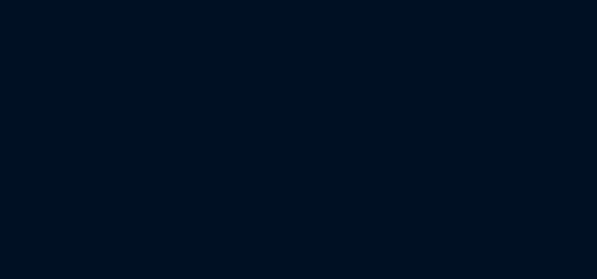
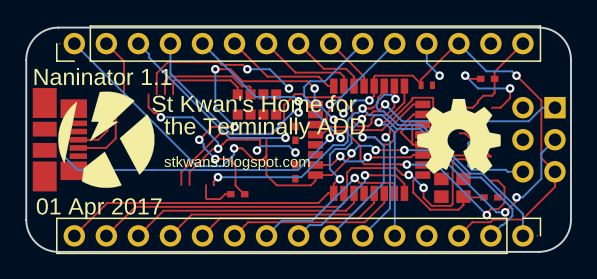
board edge: none -> (538, 27) (58, 27) (46, 30) (32, 40) (26, 55) (26, 219) (28, 232) (38, 245) (50, 250) (58, 251) (538, 251) (551, 249) (564, 239) (570, 224) (570, 59) (568, 47) (561, 36) (551, 30) (538, 27)
bottom track: none -> (74, 43) (196, 166) (222, 166) (234, 154) (234, 148)
top track: none -> (106, 43) (123, 61) (123, 94)
bottom track: none -> (138, 43) (149, 54) (149, 57) (229, 137) (285, 137)
bottom track: none -> (170, 43) (170, 73) (231, 134) (270, 134) (292, 112) (298, 112)
bottom track: none -> (202, 43) (255, 96) (294, 96) (298, 101)
top track: none -> (234, 43) (267, 76) (318, 76) (328, 86) (333, 86)
top track: none -> (266, 43) (295, 72) (339, 72) (343, 76) (343, 86)
top track: none -> (298, 43) (323, 68) (346, 68) (353, 76) (353, 86)
part: none -> (298, 43)
top track: none -> (330, 43) (364, 76) (364, 86)
bottom track: none -> (362, 43) (325, 81) (310, 81) (304, 87) (304, 96) (312, 104) (312, 110) (340, 137)
bottom track: none -> (394, 43) (333, 104) (329, 104)
bottom track: none -> (426, 43) (426, 62) (439, 75)
top track: none -> (458, 43) (421, 79) (421, 85)
bottom track: none -> (458, 43) (486, 71) (512, 71) (516, 75)
top track: none -> (522, 43) (494, 71) (494, 93) (491, 95) (483, 95) (472, 107) (464, 107)
top track: none -> (215, 69) (230, 69) (242, 81) (307, 81) (314, 88)
bottom track: none -> (215, 69) (215, 107) (234, 126)
via: none -> (215, 69)
top track: none -> (247, 69) (243, 64) (221, 64) (218, 62) (168, 62) (156, 73) (156, 94)
bottom track: none -> (247, 69) (269, 69) (289, 88)
via: none -> (247, 69)
via: none -> (439, 75)
top track: none -> (465, 75) (468, 78) (480, 78)
bottom track: none -> (465, 75) (478, 88) (510, 88)
via: none -> (465, 75)
top track: none -> (516, 75) (541, 100) (541, 158) (554, 171) (554, 186) (522, 219) (493, 219) (490, 222) (472, 222) (458, 235)
via: none -> (516, 75)
text: none -> Naninator 1.1 (102, 76)
part: none -> (487, 78)
top track: none -> (421, 84) (412, 75) (375, 75) (374, 95) (369, 100)
part: none -> (426, 85)
top track: none -> (384, 86) (384, 91) (378, 97) (378, 103) (371, 108) (362, 108)
top track: none -> (394, 86) (394, 106) (386, 115) (375, 115) (368, 126) (357, 126) (352, 120) (352, 109) (339, 97) (305, 97) (302, 94) (295, 94) (284, 105) (284, 121) (272, 133) (219, 134) (181, 172) (181, 185)
top track: none -> (404, 86) (404, 102) (384, 122) (378, 122)
via: none -> (289, 88)
bottom track: none -> (314, 88) (314, 100) (333, 119)
via: none -> (314, 88)
top track: none -> (510, 88) (510, 98) (500, 107) (491, 107)
via: none -> (510, 88)
drawing: none -> [58, 91, 155, 188]
top track: none -> (107, 94) (107, 130) (98, 139) (78, 139)
top track: none -> (115, 94) (115, 138) (106, 147) (78, 147)
top track: none -> (148, 94) (148, 107) (160, 117)
top track: none -> (164, 94) (164, 81) (169, 76) (232, 76) (242, 86) (249, 86) (250, 94)
top track: none -> (173, 94) (174, 80) (230, 80) (237, 87) (237, 94)
drawing: none -> [417, 98, 501, 174]
bottom track: none -> (395, 99) (391, 94) (384, 94) (376, 102) (376, 107) (380, 111) (383, 111) (398, 125) (421, 125) (470, 173) (482, 173) (522, 213) (522, 235)
via: none -> (395, 99)
bottom track: none -> (369, 100) (356, 100) (343, 113)
via: none -> (369, 100)
via: none -> (298, 101)
text: none -> St Kwan's Home for (254, 103)
part: none -> (237, 104)
part: none -> (250, 104)
part: none -> (263, 104)
part: none -> (276, 104)
top track: none -> (329, 104) (329, 110) (326, 113) (326, 122) (315, 124)
via: none -> (329, 104)
top track: none -> (385, 104) (378, 111) (366, 114) (361, 119)
bottom track: none -> (385, 104) (402, 121) (528, 121) (542, 107) (554, 107)
via: none -> (385, 104)
top track: none -> (422, 104) (413, 104) (390, 127) (390, 133) (385, 137)
via: none -> (362, 108)
via: none -> (298, 112)
via: none -> (343, 113)
top track: none -> (422, 114) (413, 114) (393, 133) (393, 139) (389, 144) (382, 144) (375, 137) (362, 137)
bottom track: none -> (160, 117) (192, 117) (218, 142) (218, 148)
via: none -> (160, 117)
via: none -> (333, 119)
bottom track: none -> (361, 119) (351, 129) (351, 143) (345, 149) (335, 149) (329, 154) (329, 169) (339, 179)
via: none -> (361, 119)
bottom track: none -> (378, 122) (380, 124) (386, 124) (394, 132) (394, 235)
via: none -> (378, 122)
top track: none -> (422, 124) (412, 125) (412, 143)
top track: none -> (234, 126) (212, 126) (199, 139)
via: none -> (234, 126)
text: none -> the Terminally ADD (264, 128)
part: none -> (295, 133)
top track: none -> (459, 133) (465, 133) (471, 139)
top track: none -> (315, 134) (321, 134) (329, 126) (349, 126) (353, 130) (382, 130) (412, 97) (432, 97) (433, 120) (412, 121) (400, 132) (413, 144) (422, 144)
via: none -> (285, 137)
via: none -> (340, 137)
bottom track: none -> (362, 137) (375, 137) (383, 146) (383, 182) (330, 235)
via: none -> (362, 137)
bottom track: none -> (385, 137) (390, 141) (390, 208) (362, 235)
via: none -> (385, 137)
top track: none -> (329, 138) (337, 130) (345, 130) (360, 146) (360, 160) (364, 164) (406, 164)
bottom track: none -> (329, 138) (297, 170) (77, 170) (62, 155)
via: none -> (329, 138)
part: none -> (59, 139)
bottom track: none -> (199, 139) (215, 158)
via: none -> (199, 139)
top track: none -> (266, 139) (266, 174) (276, 185) (310, 185) (315, 180) (315, 175) (332, 175) (351, 155) (351, 153)
part: none -> (369, 139)
bottom track: none -> (471, 139) (468, 143) (468, 166) (471, 169) (522, 171)
part: none -> (538, 139)
bottom track: none -> (554, 139) (541, 153) (541, 178) (522, 197) (516, 197)
via: none -> (218, 148)
top track: none -> (234, 148) (242, 148) (253, 159) (262, 159) (266, 155)
via: none -> (234, 148)
top track: none -> (483, 149) (490, 156) (413, 154) (410, 157) (367, 157)
top track: none -> (256, 150) (260, 147) (260, 139) (227, 139) (218, 148) (212, 148) (189, 172) (189, 185)
bottom track: none -> (256, 150) (261, 146) (289, 146) (295, 152)
via: none -> (256, 150)
bottom track: none -> (375, 150) (371, 145) (358, 145) (351, 153)
via: none -> (375, 150)
top track: none -> (404, 150) (375, 150)
bottom track: none -> (404, 150) (434, 150) (496, 212) (505, 212)
via: none -> (404, 150)
via: none -> (295, 152)
via: none -> (351, 153)
top track: none -> (340, 156) (331, 164) (315, 164)
bottom track: none -> (340, 156) (345, 161) (363, 161) (367, 157)
via: none -> (340, 156)
via: none -> (367, 157)
top track: none -> (215, 158) (229, 158) (235, 165) (235, 185) (244, 194)
via: none -> (215, 158)
top track: none -> (475, 162) (469, 162) (465, 159) (452, 160) (452, 204) (450, 205) (431, 205) (423, 197) (423, 187)
text: none -> stkwans.blogspot.com (237, 163)
bottom track: none -> (406, 164) (436, 164) (486, 215)
via: none -> (406, 164)
part: none -> (295, 171)
top track: none -> (408, 174) (402, 174) (395, 168) (351, 168) (347, 172) (347, 190) (343, 193) (343, 202) (339, 206) (135, 206) (106, 235)
bottom track: none -> (408, 174) (423, 187)
via: none -> (408, 174)
top track: none -> (364, 175) (395, 175) (404, 183) (404, 193)
bottom track: none -> (364, 175) (364, 181) (321, 225) (309, 225) (298, 235)
via: none -> (364, 175)
top track: none -> (422, 175) (418, 175) (413, 180) (413, 192) (430, 209) (458, 209) (463, 204) (463, 196) (483, 197)
top track: none -> (217, 177) (213, 181) (214, 185)
bottom track: none -> (217, 177) (301, 177) (333, 145) (343, 145) (347, 141) (347, 120) (362, 108) (369, 115) (382, 115) (396, 128) (420, 128) (468, 177) (481, 177) (512, 208) (512, 215) (490, 235)
via: none -> (217, 177)
top track: none -> (354, 178) (359, 182) (393, 182) (394, 193)
bottom track: none -> (354, 178) (312, 220) (281, 220) (266, 235)
via: none -> (354, 178)
top track: none -> (339, 179) (333, 183) (333, 193) (328, 193) (318, 203) (107, 203) (74, 235)
via: none -> (339, 179)
top track: none -> (490, 180) (497, 180) (504, 187) (504, 202) (498, 209) (490, 209) (486, 215)
top track: none -> (205, 185) (206, 199) (220, 199) (225, 194) (230, 194)
via: none -> (423, 187)
part: none -> (452, 187)
top track: none -> (353, 193) (353, 202) (346, 210) (163, 210) (138, 235)
top track: none -> (364, 193) (364, 202) (352, 214) (191, 214) (170, 235)
top track: none -> (374, 193) (374, 202) (358, 218) (219, 218) (202, 235)
top track: none -> (384, 193) (384, 202) (364, 222) (248, 222) (234, 235)
part: none -> (237, 194)
part: none -> (490, 197)
top track: none -> (516, 197) (516, 201) (505, 212)
via: none -> (516, 197)
text: none -> 01 Apr 2017 (99, 208)
via: none -> (505, 212)
via: none -> (486, 215)
part: none -> (298, 235)

